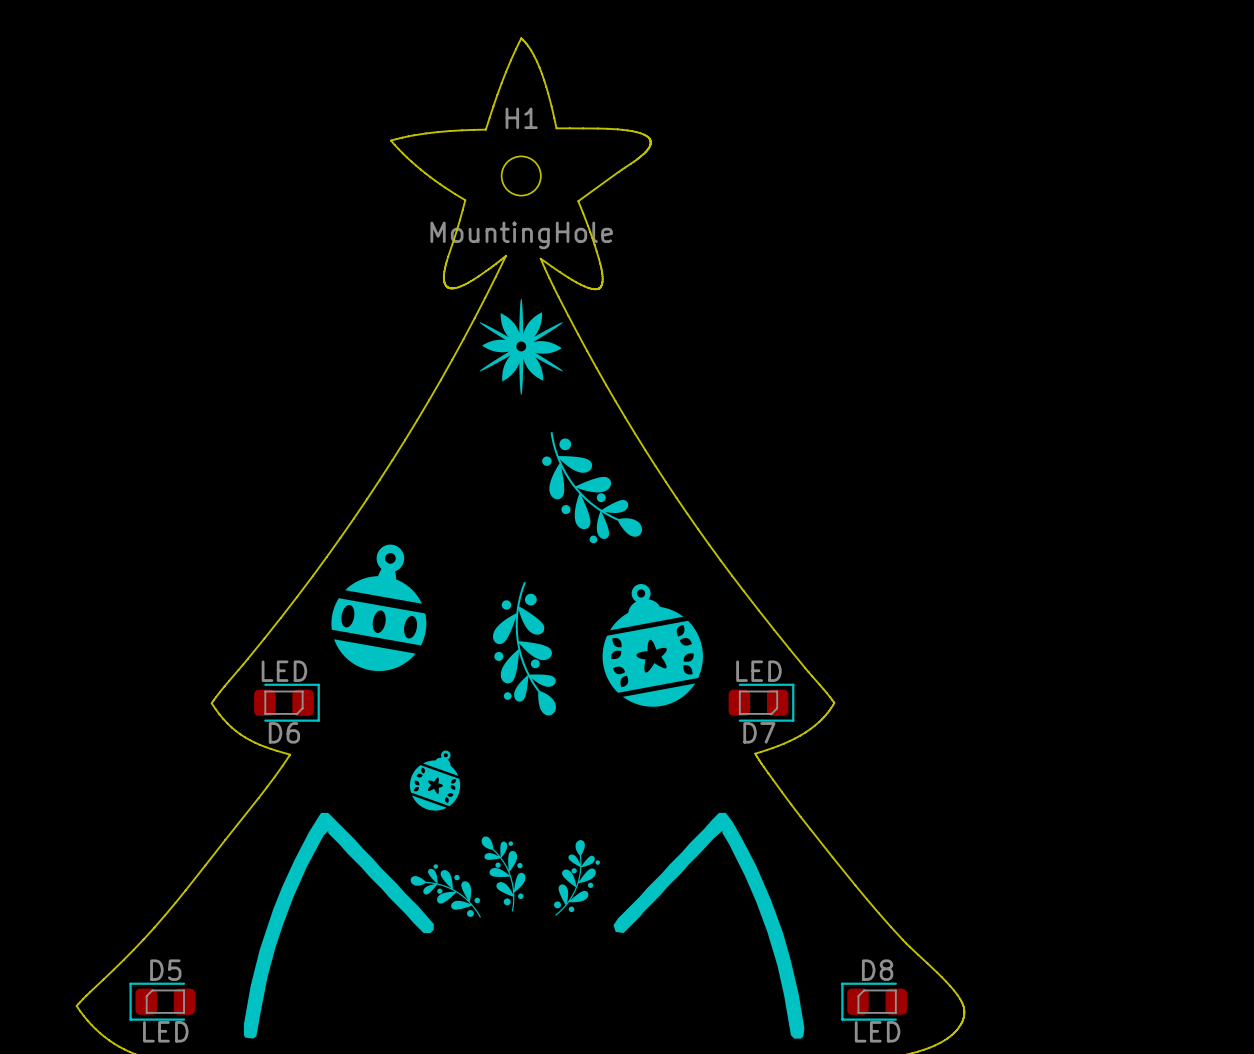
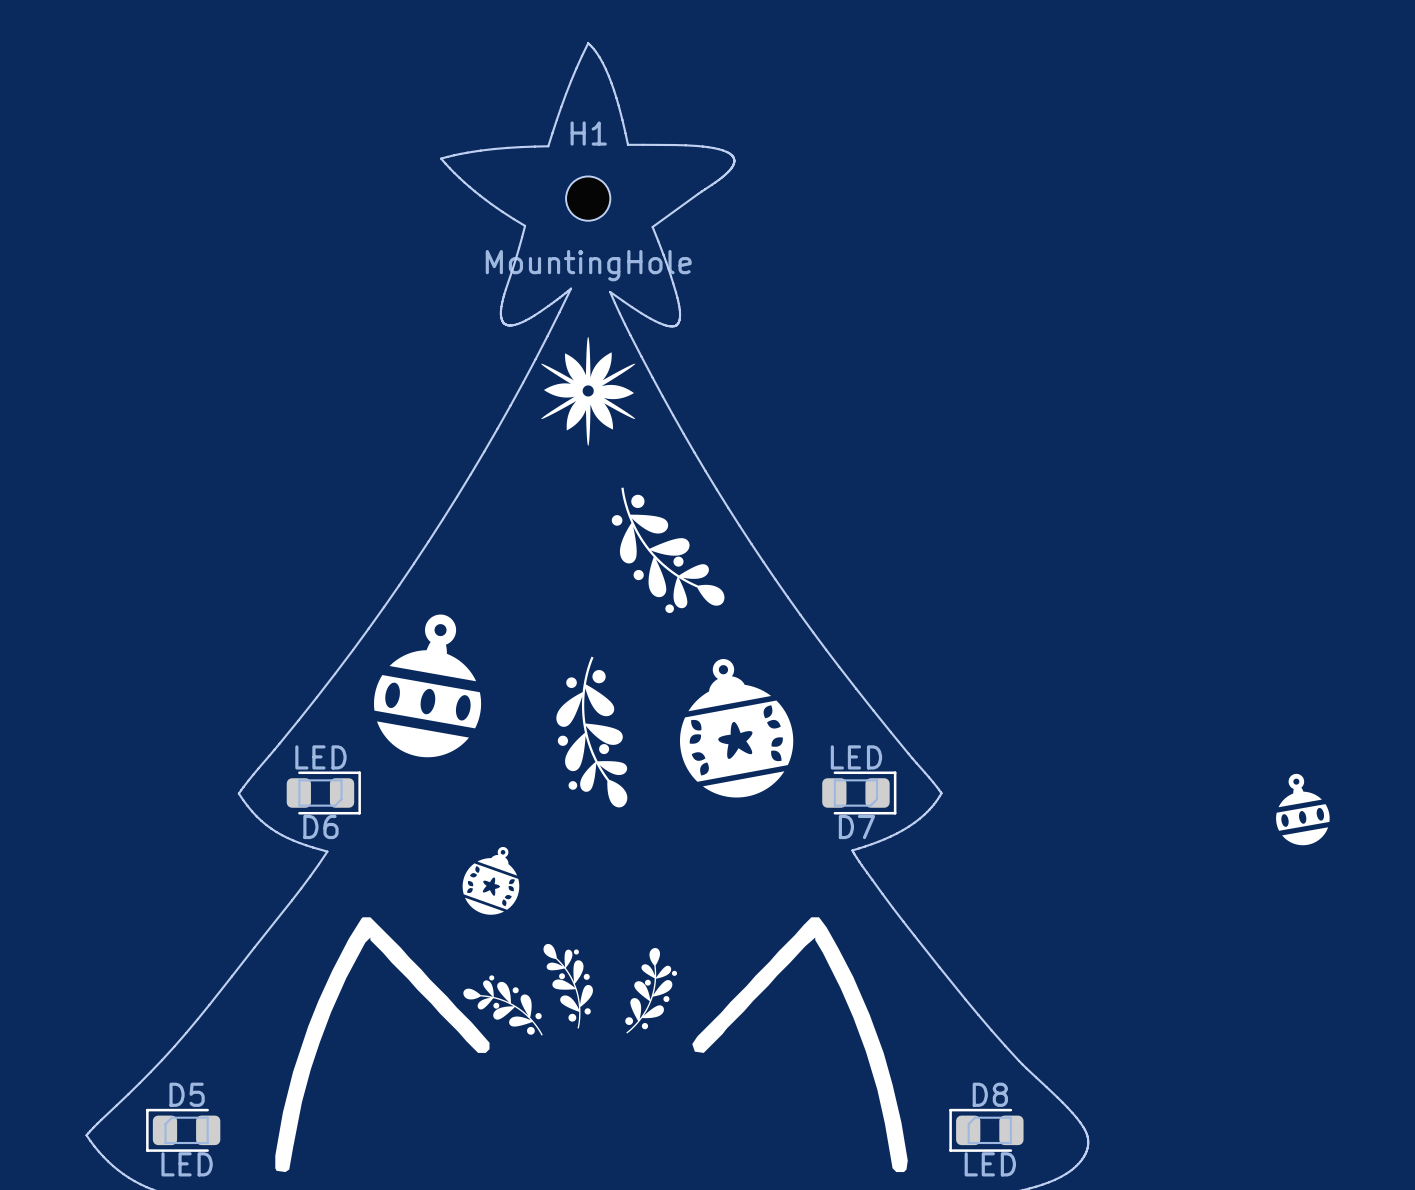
drawing: none -> [1276, 773, 1330, 846]

